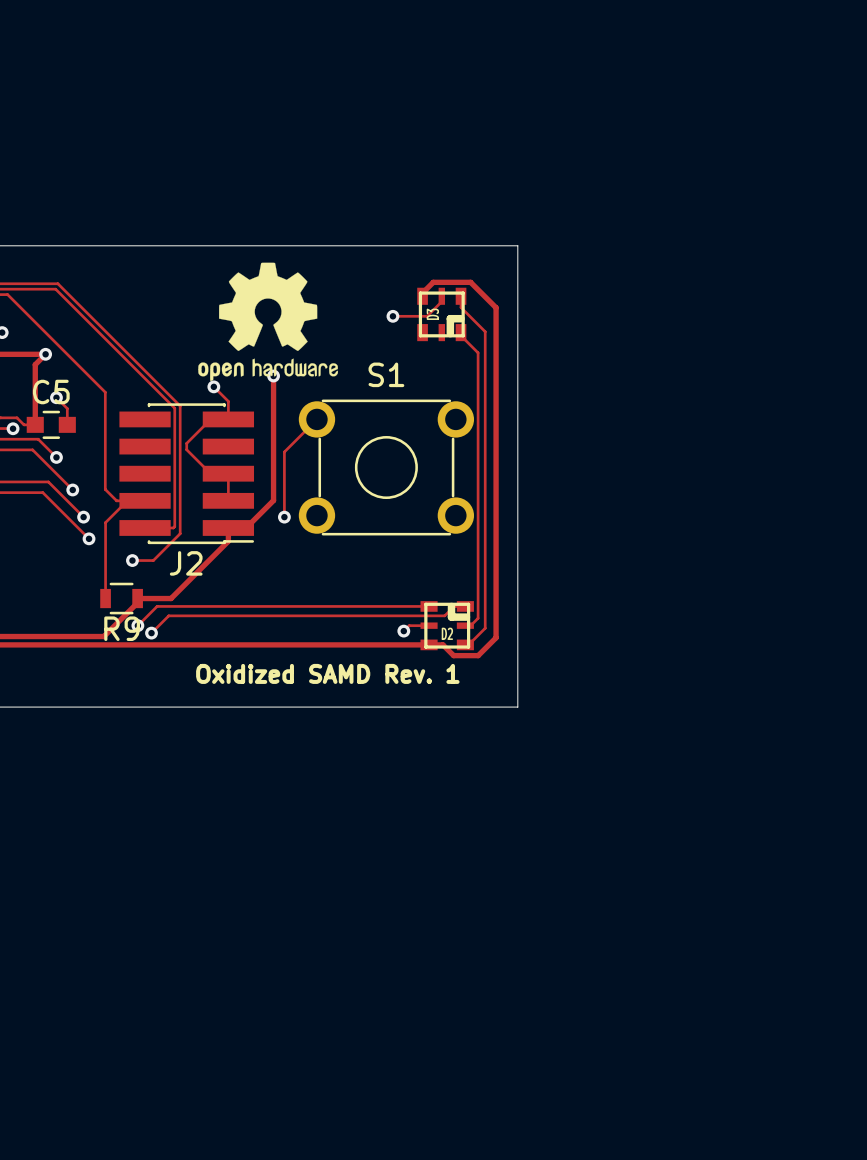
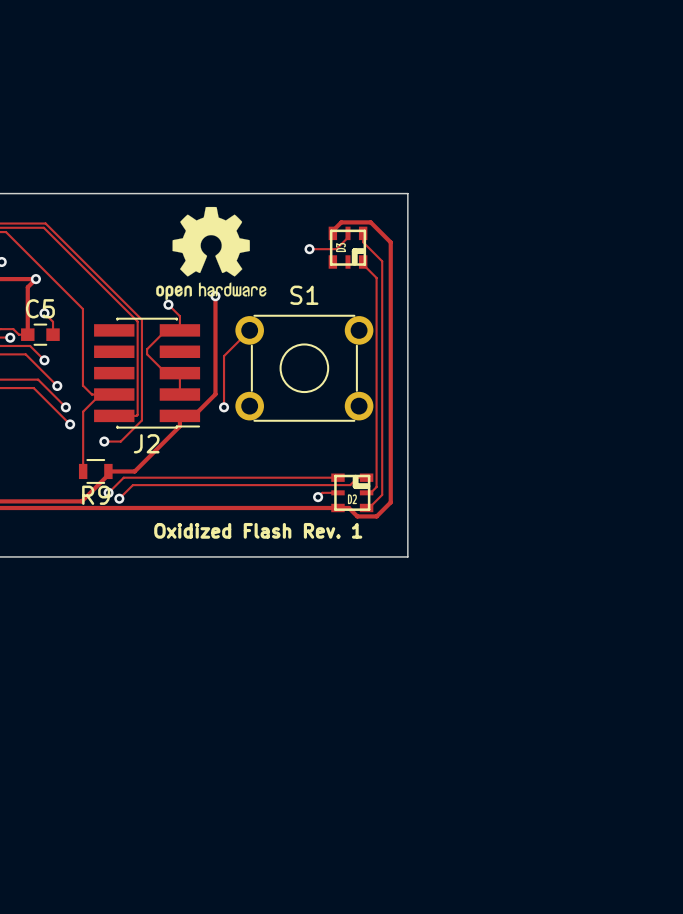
text: Oxidized SAMD Rev. 1 (327, 673) -> Oxidized Flash Rev. 1 (258, 530)

